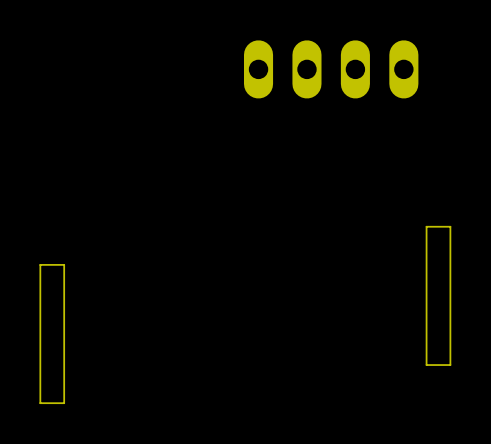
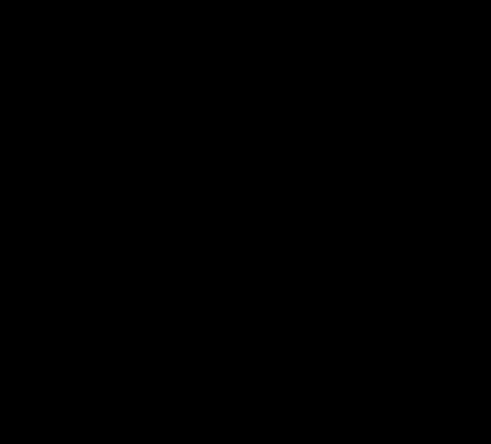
part: (331, 69) -> none
board edge: (450, 226) (426, 226) (426, 365) (450, 365) (450, 226) -> none
board edge: (64, 264) (40, 264) (40, 403) (64, 403) (64, 264) -> none

